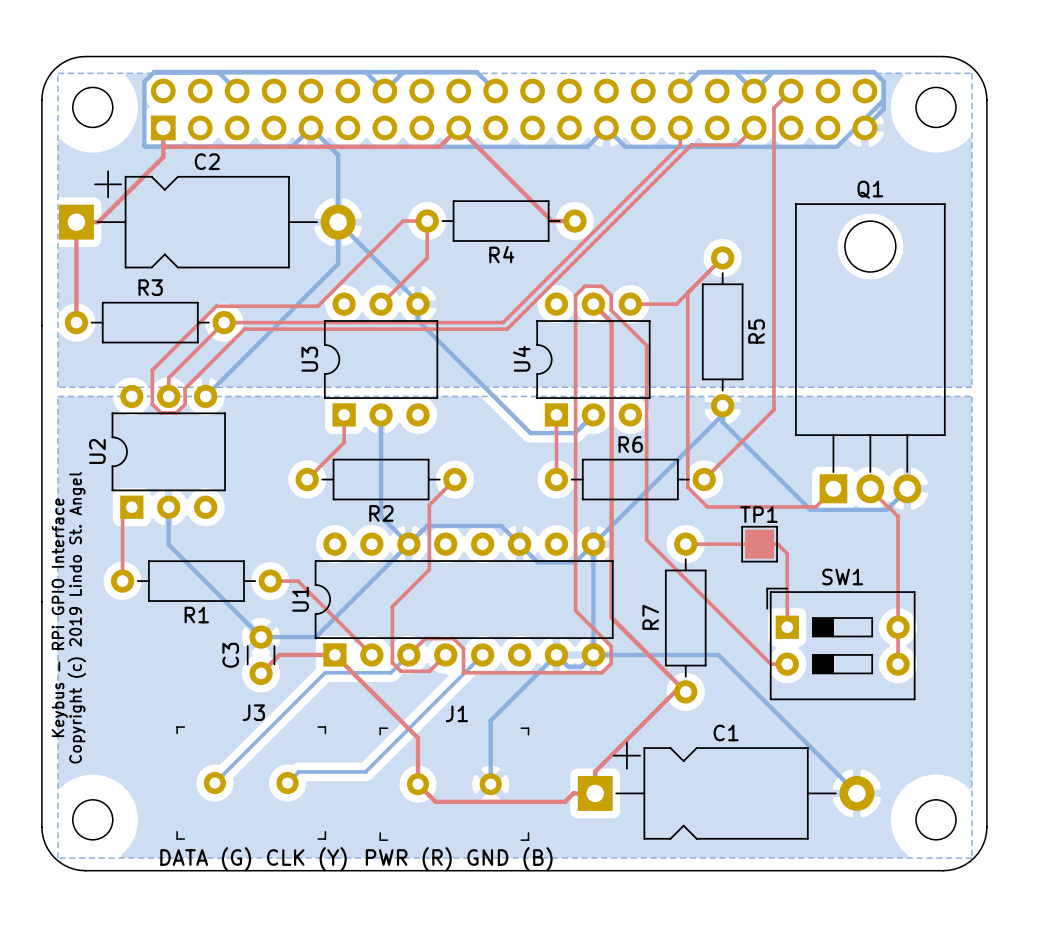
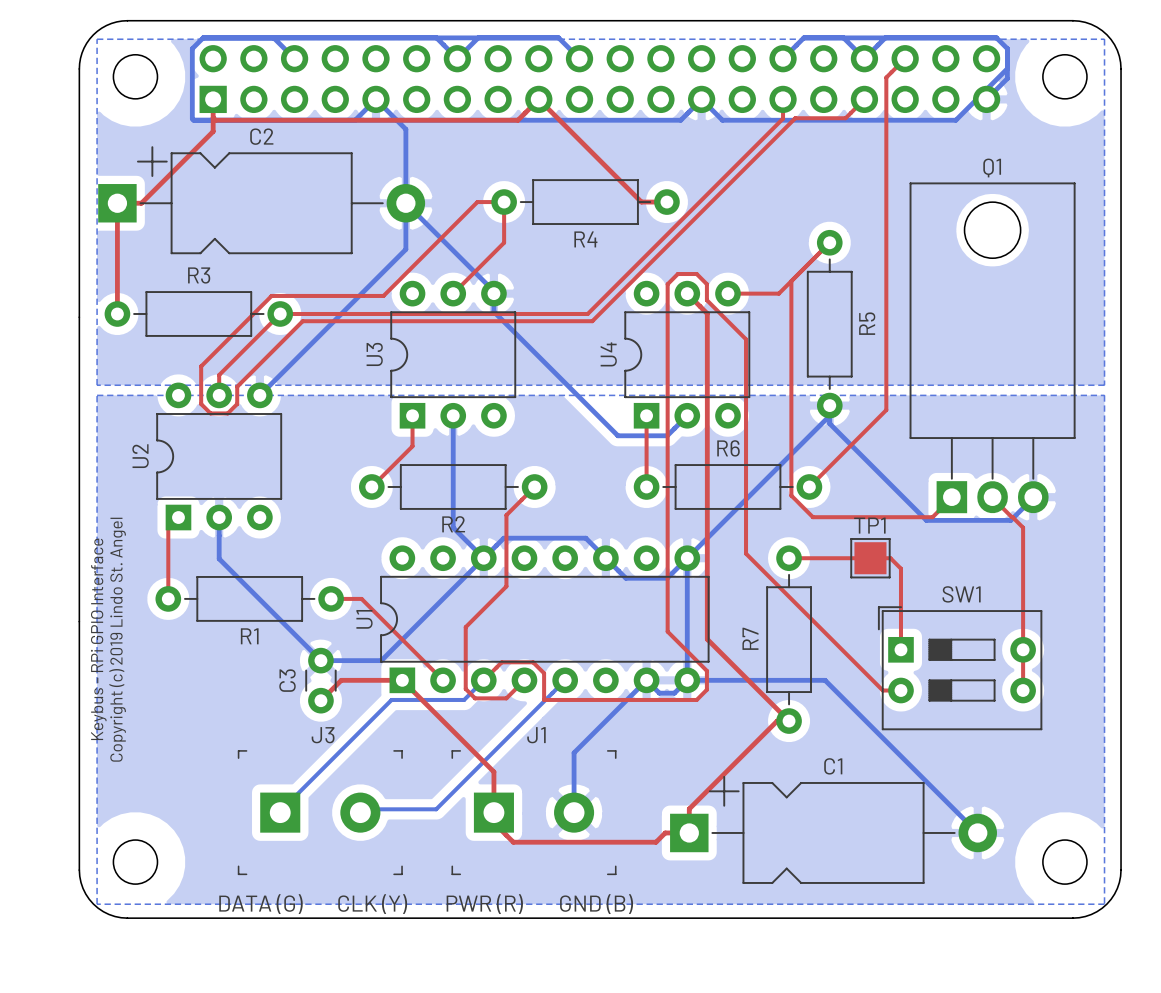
J3 footprint: [176, 726, 327, 840] -> [237, 750, 403, 876]
J1 footprint: [379, 727, 530, 841] -> [451, 750, 617, 876]

